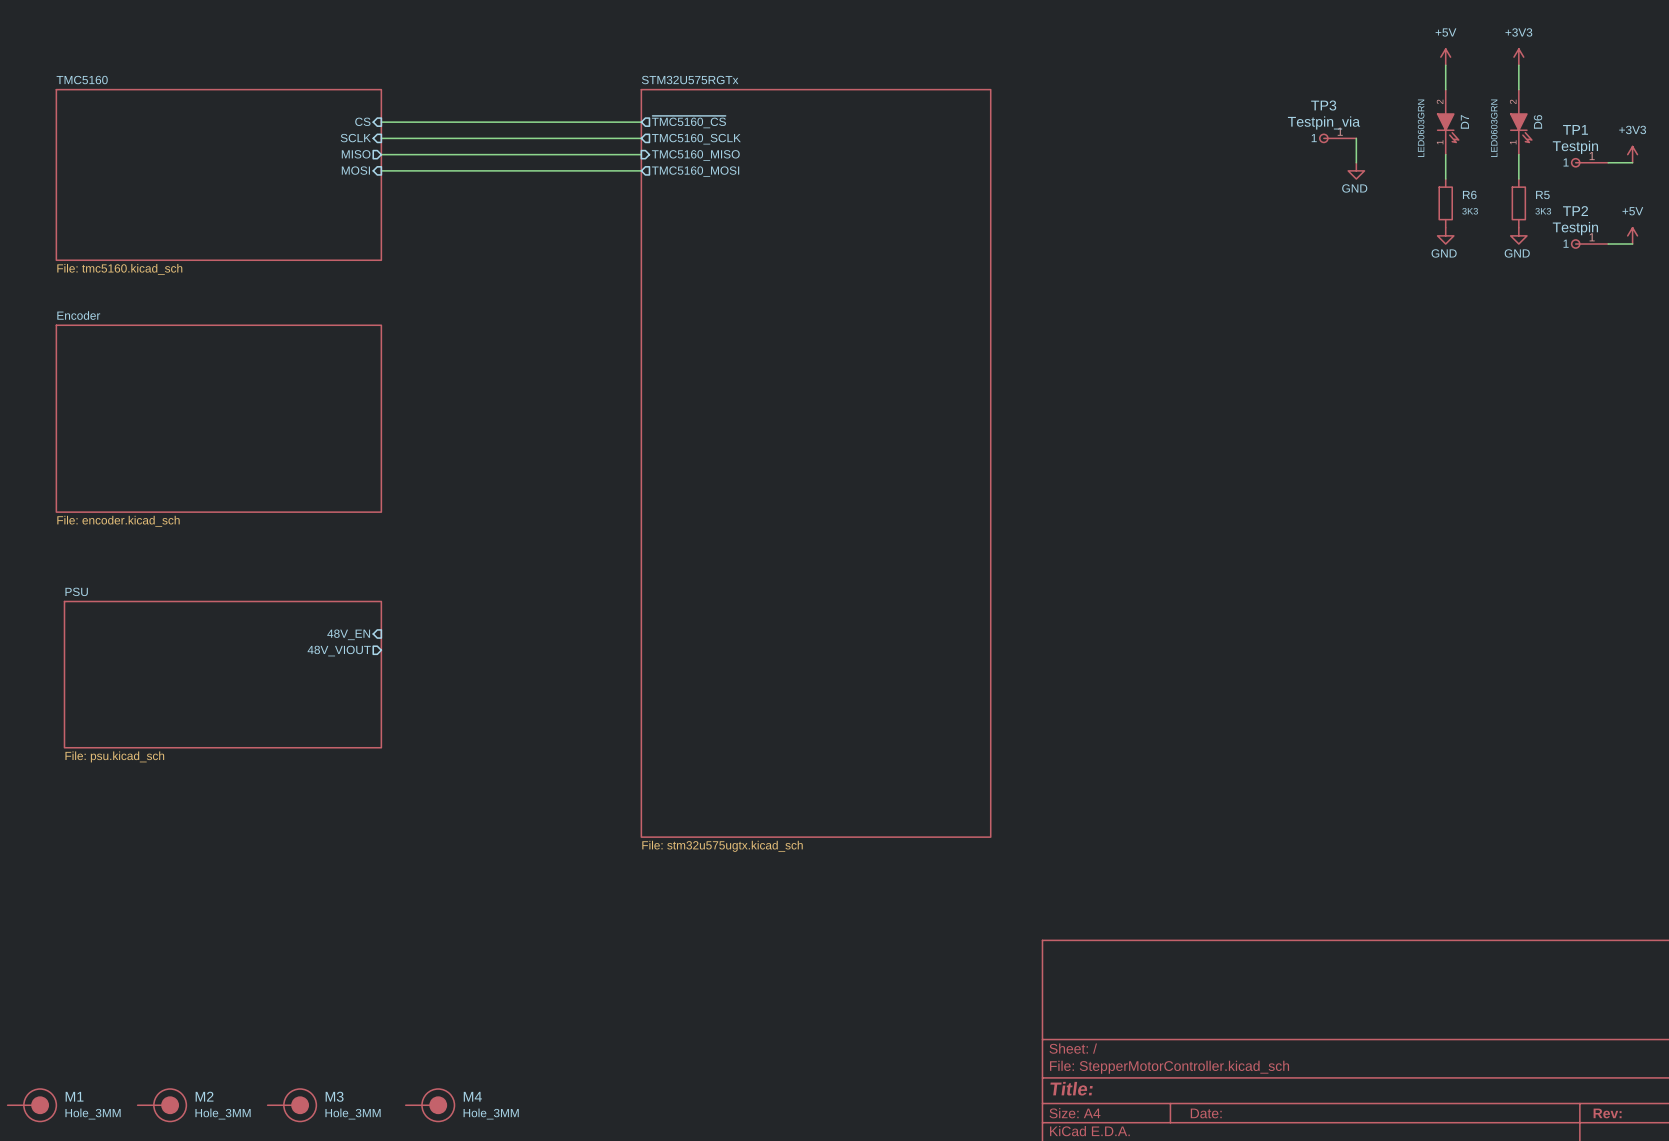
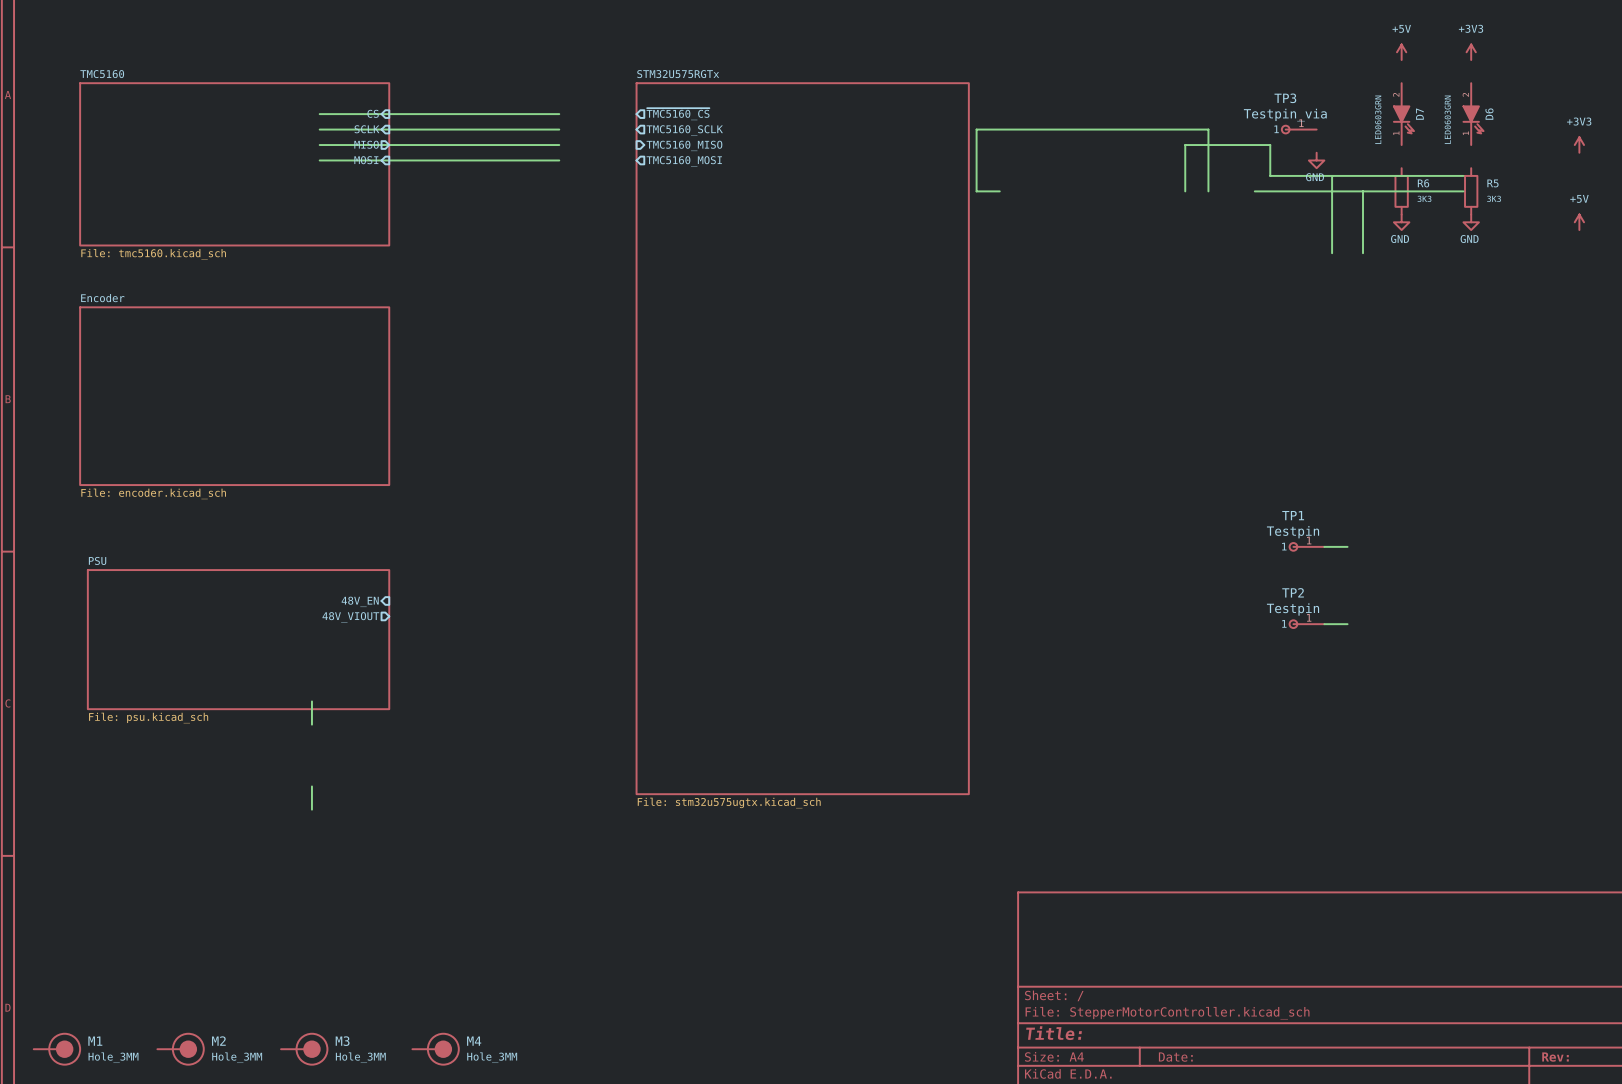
wire: (1445, 65) (1445, 89) -> none
wire: (1518, 65) (1518, 89) -> none
wire: none -> (319, 114) (389, 114)
wire: (560, 122) (641, 122) -> none
wire: none -> (319, 129) (389, 129)
wire: (560, 138) (641, 138) -> none
wire: (1356, 138) (1356, 162) -> none
wire: none -> (319, 145) (389, 145)
wire: (560, 154) (641, 154) -> none
wire: (1445, 154) (1445, 179) -> none
wire: (1518, 154) (1518, 179) -> none
TP1 position: (1589, 162) -> (1306, 546)
wire: (1608, 162) (1632, 162) -> none
wire: none -> (319, 160) (389, 160)
wire: (560, 170) (641, 170) -> none
wire: none -> (1332, 175) (1332, 253)
wire: none -> (1463, 175) (1270, 175) (1270, 145) (1185, 145) (1185, 191)
wire: none -> (999, 191) (976, 191) (976, 129) (1208, 129) (1208, 191)
wire: none -> (1254, 191) (1463, 191)
wire: none -> (1363, 191) (1363, 253)
TP2 position: (1589, 244) -> (1306, 624)
wire: (1608, 244) (1632, 244) -> none
wire: none -> (1324, 546) (1347, 546)
wire: none -> (1324, 624) (1347, 624)
wire: none -> (311, 701) (311, 724)
wire: none -> (311, 786) (311, 809)

